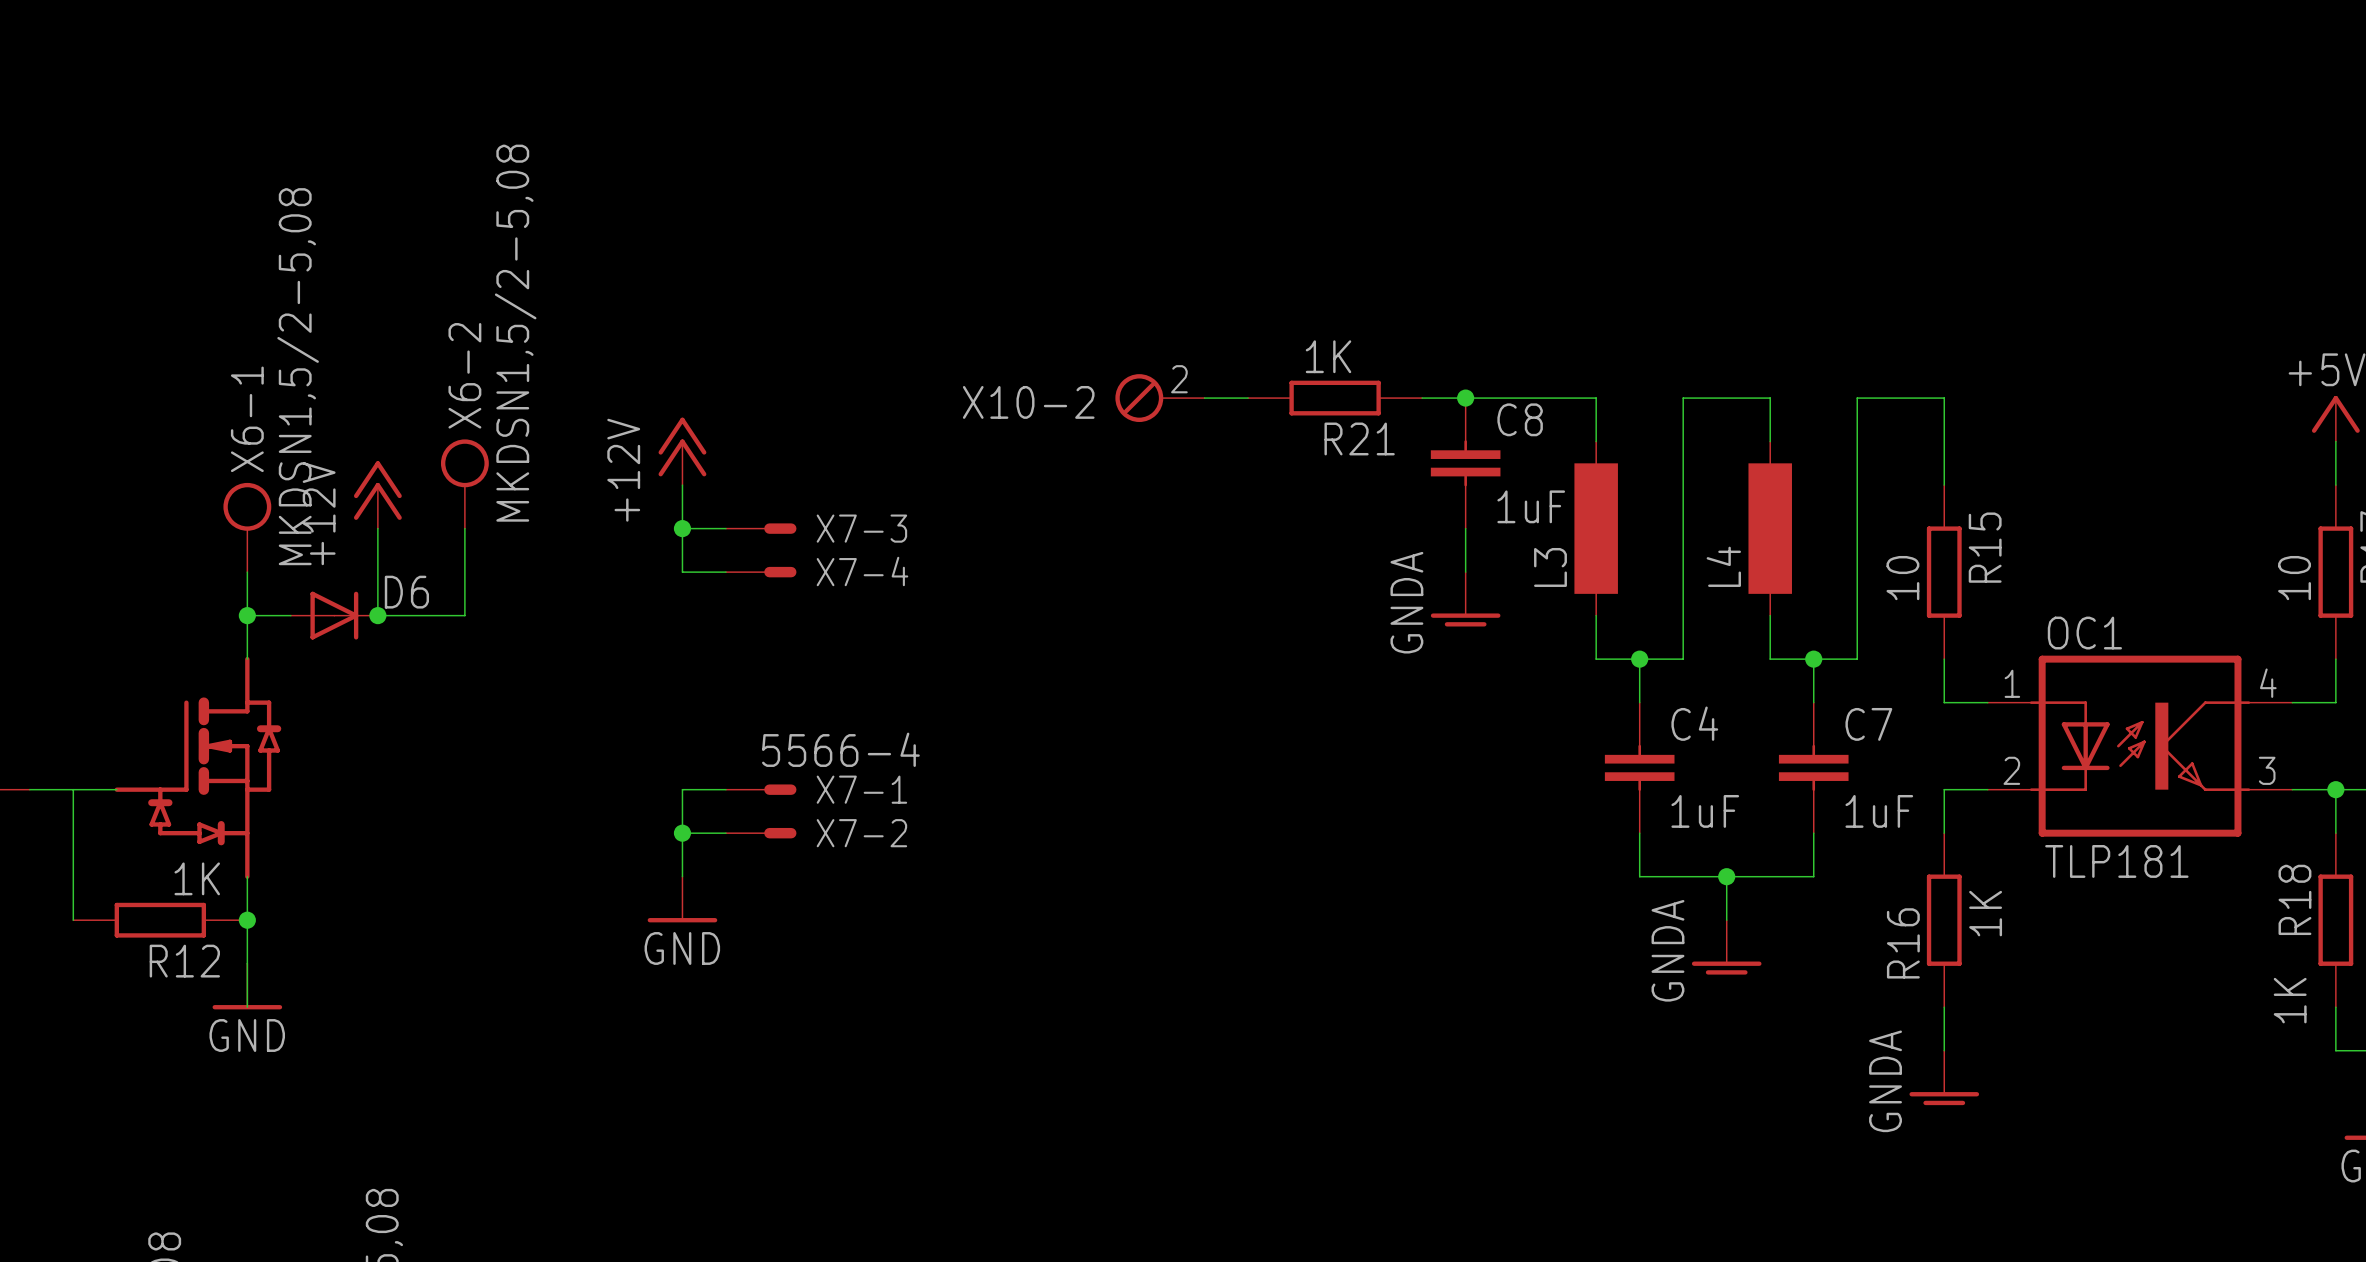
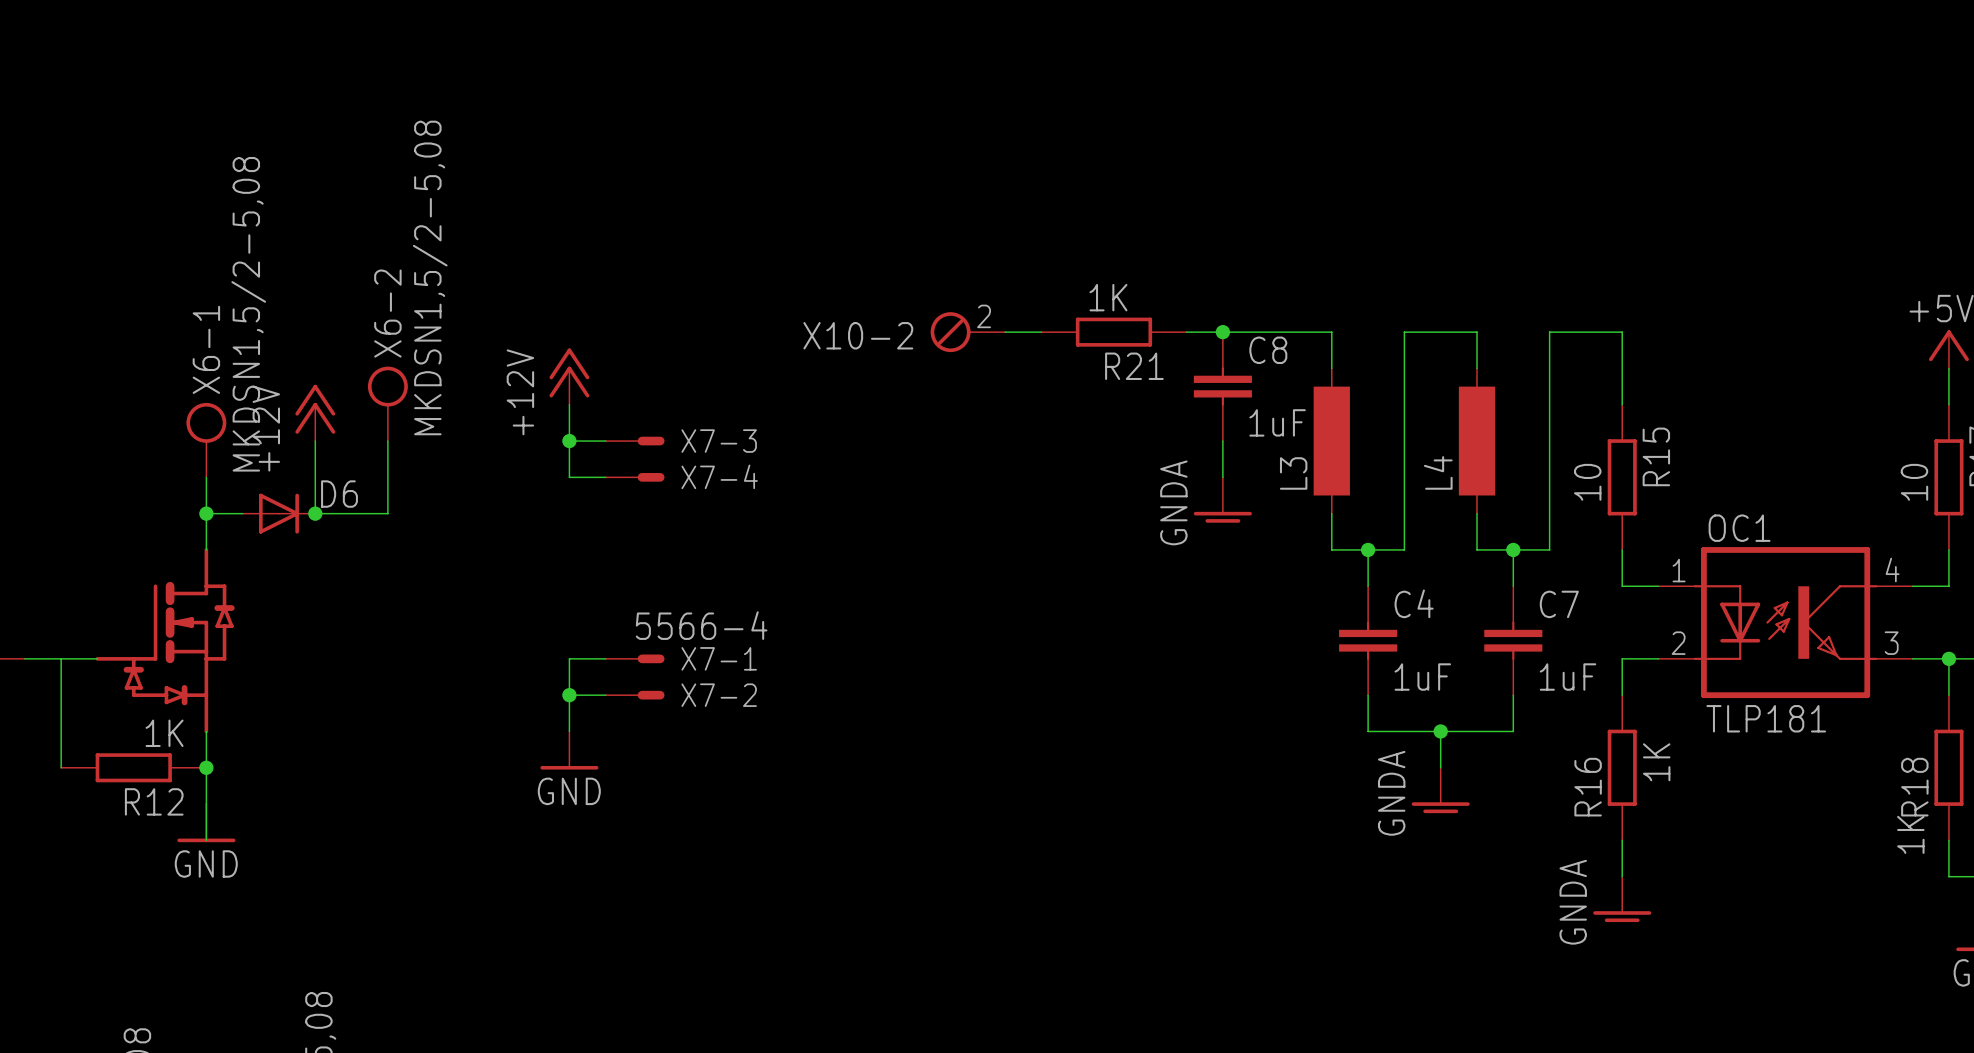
R18 name position: R18 (2294, 899) -> R18 (1914, 787)

